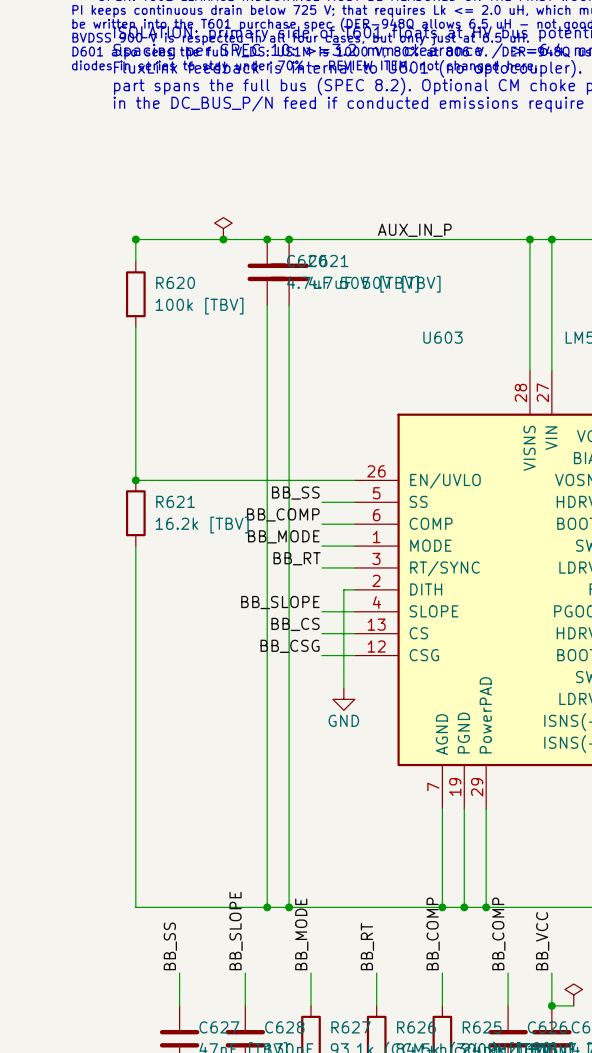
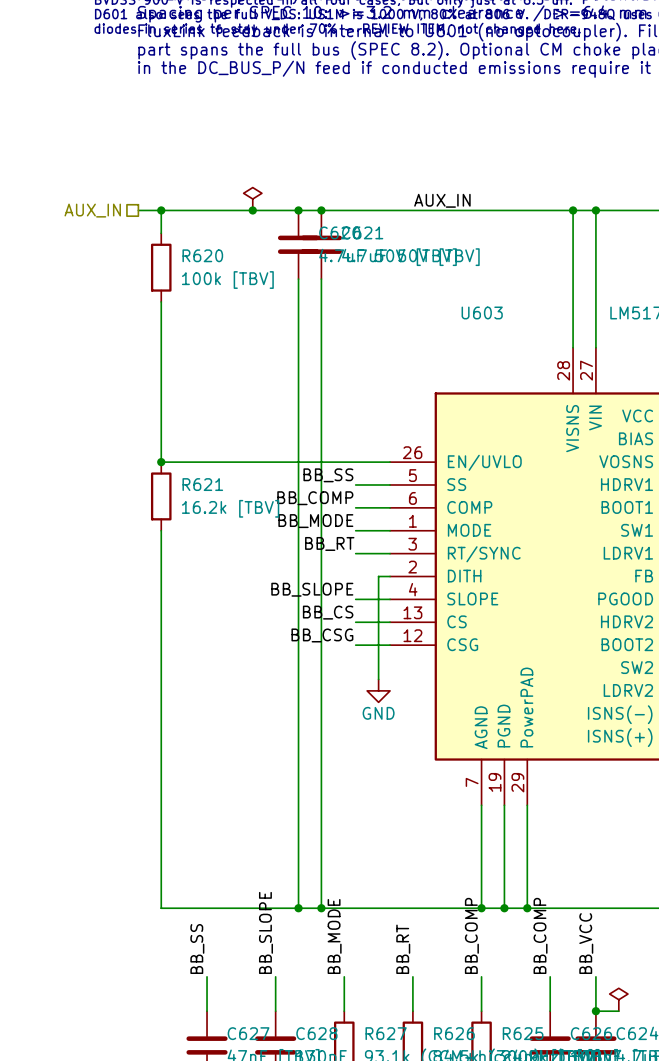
label: AUX_IN_P (414, 230) -> AUX_IN (442, 200)
hierarchical label: none -> AUX_IN (92, 210)
wire: none -> (138, 210) (161, 210)

